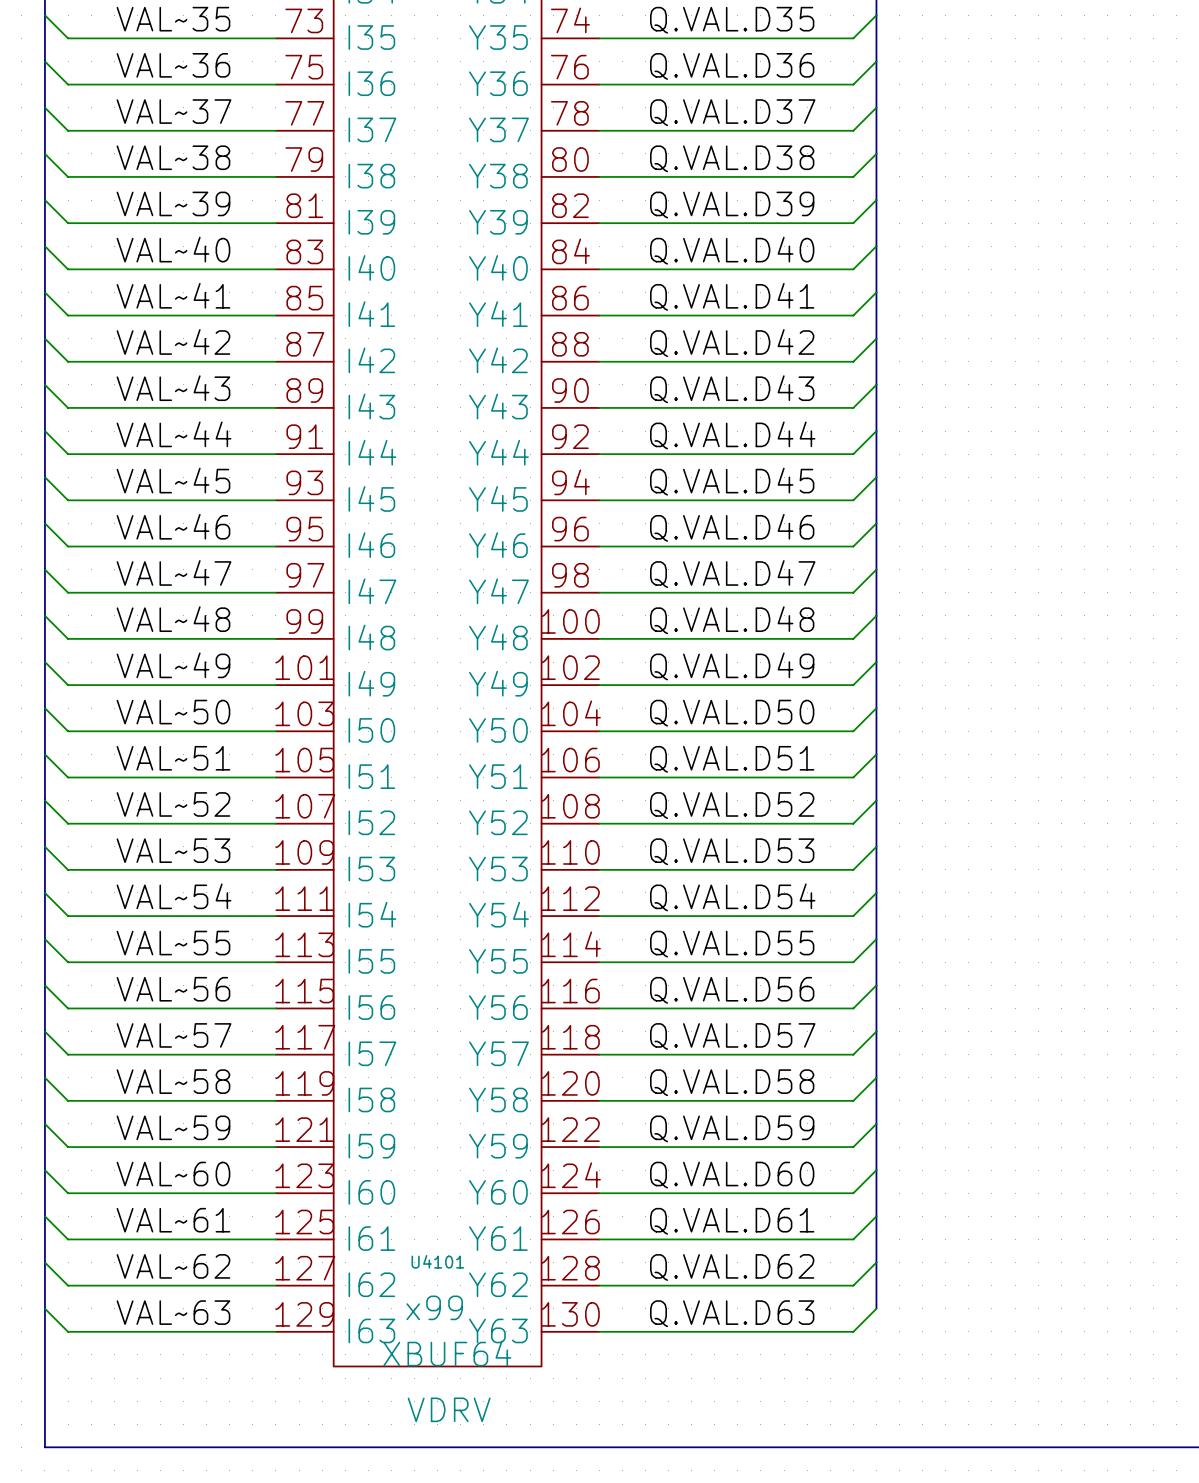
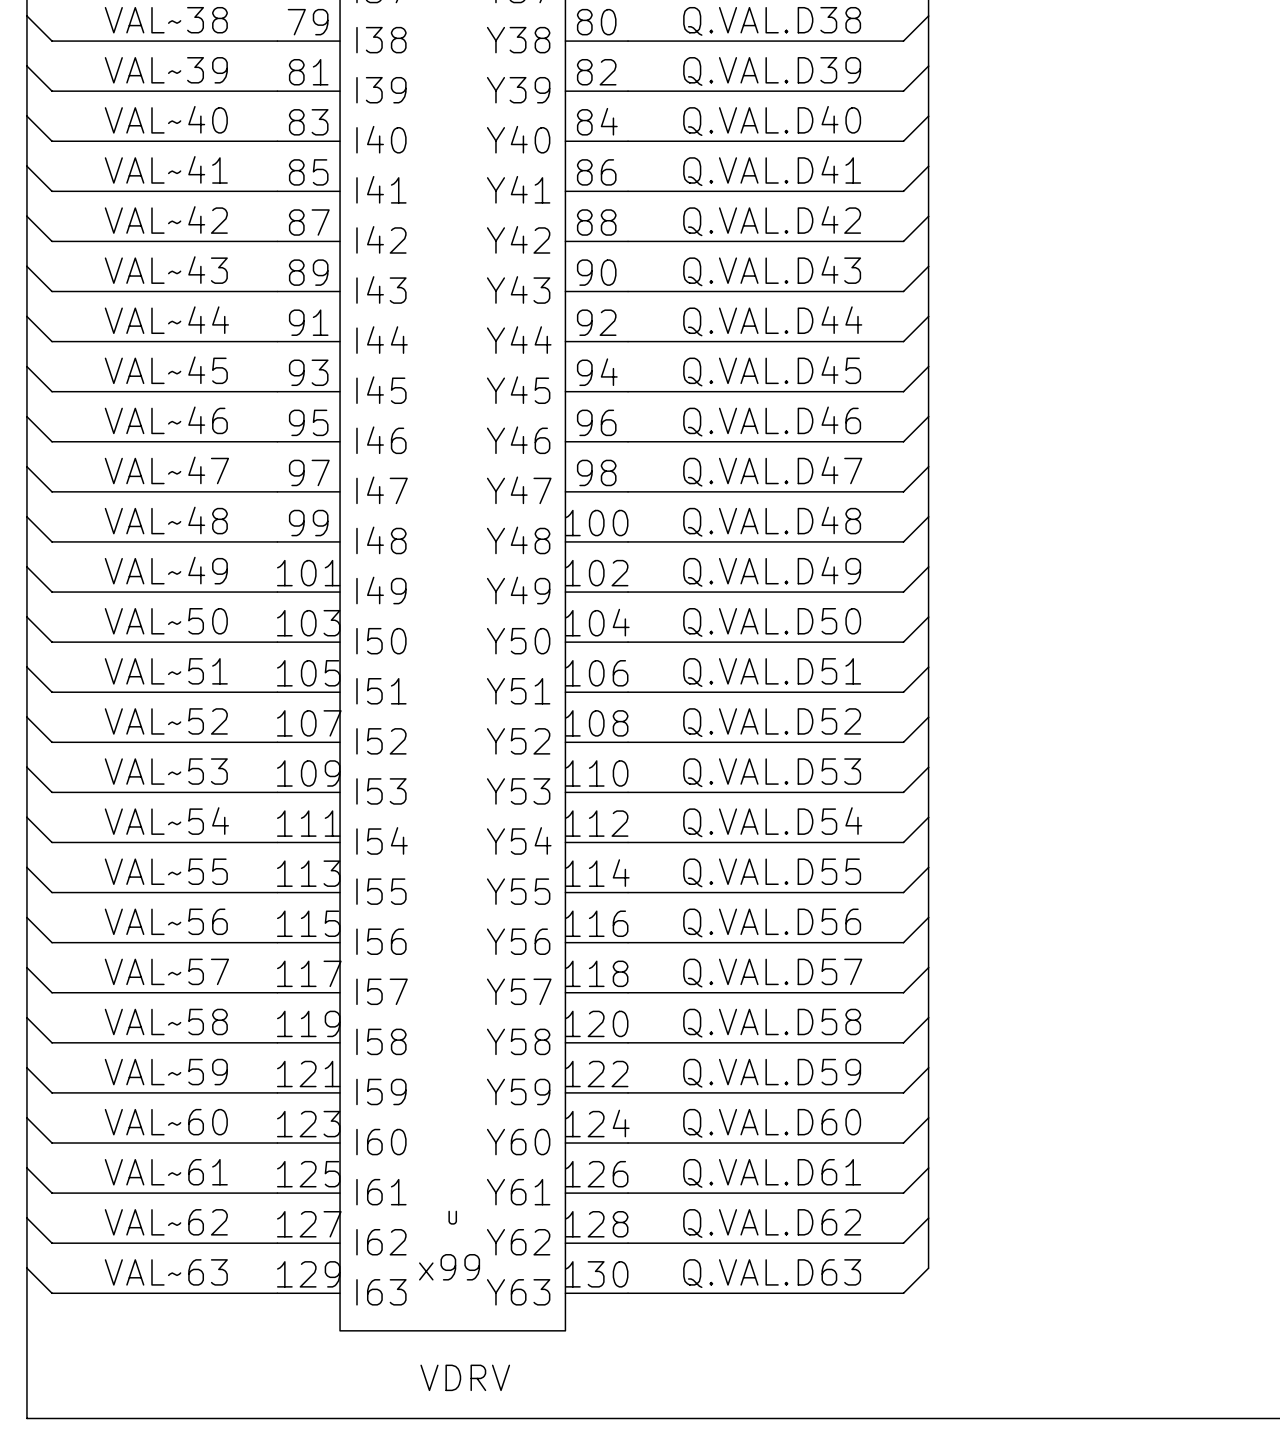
U4101 name: U4101 (437, 1261) -> U (452, 1217)
U4101 value: XBUF64 (447, 1353) -> none

